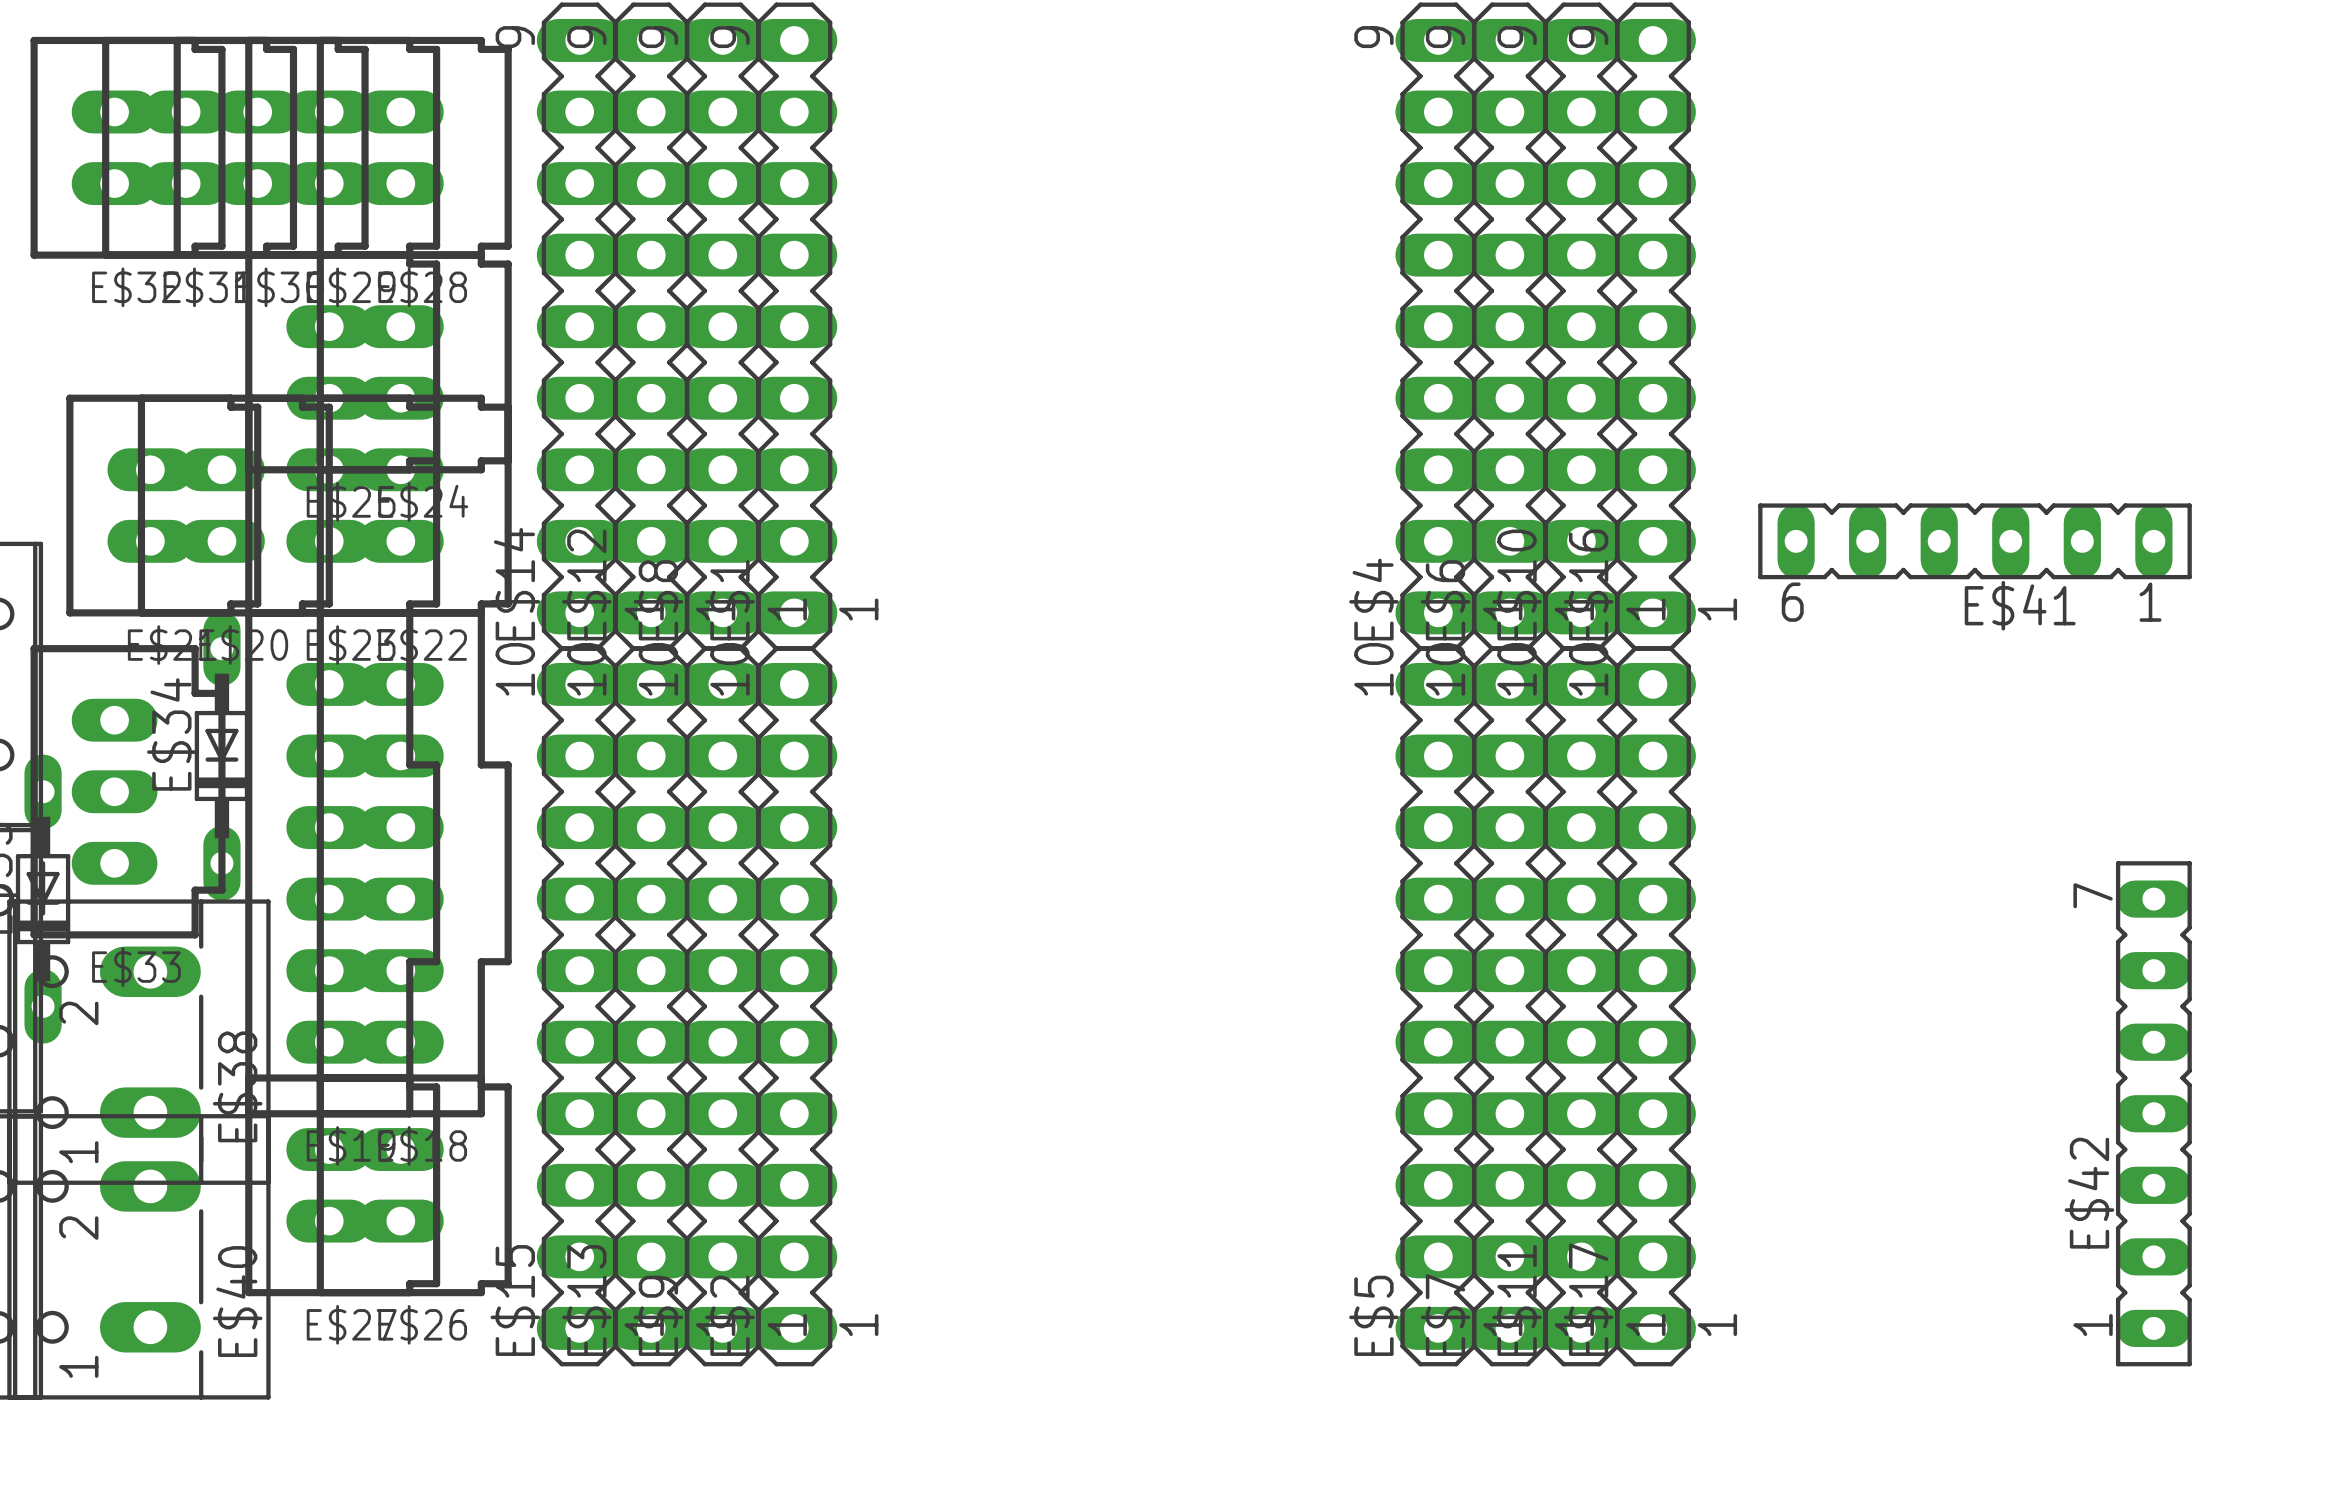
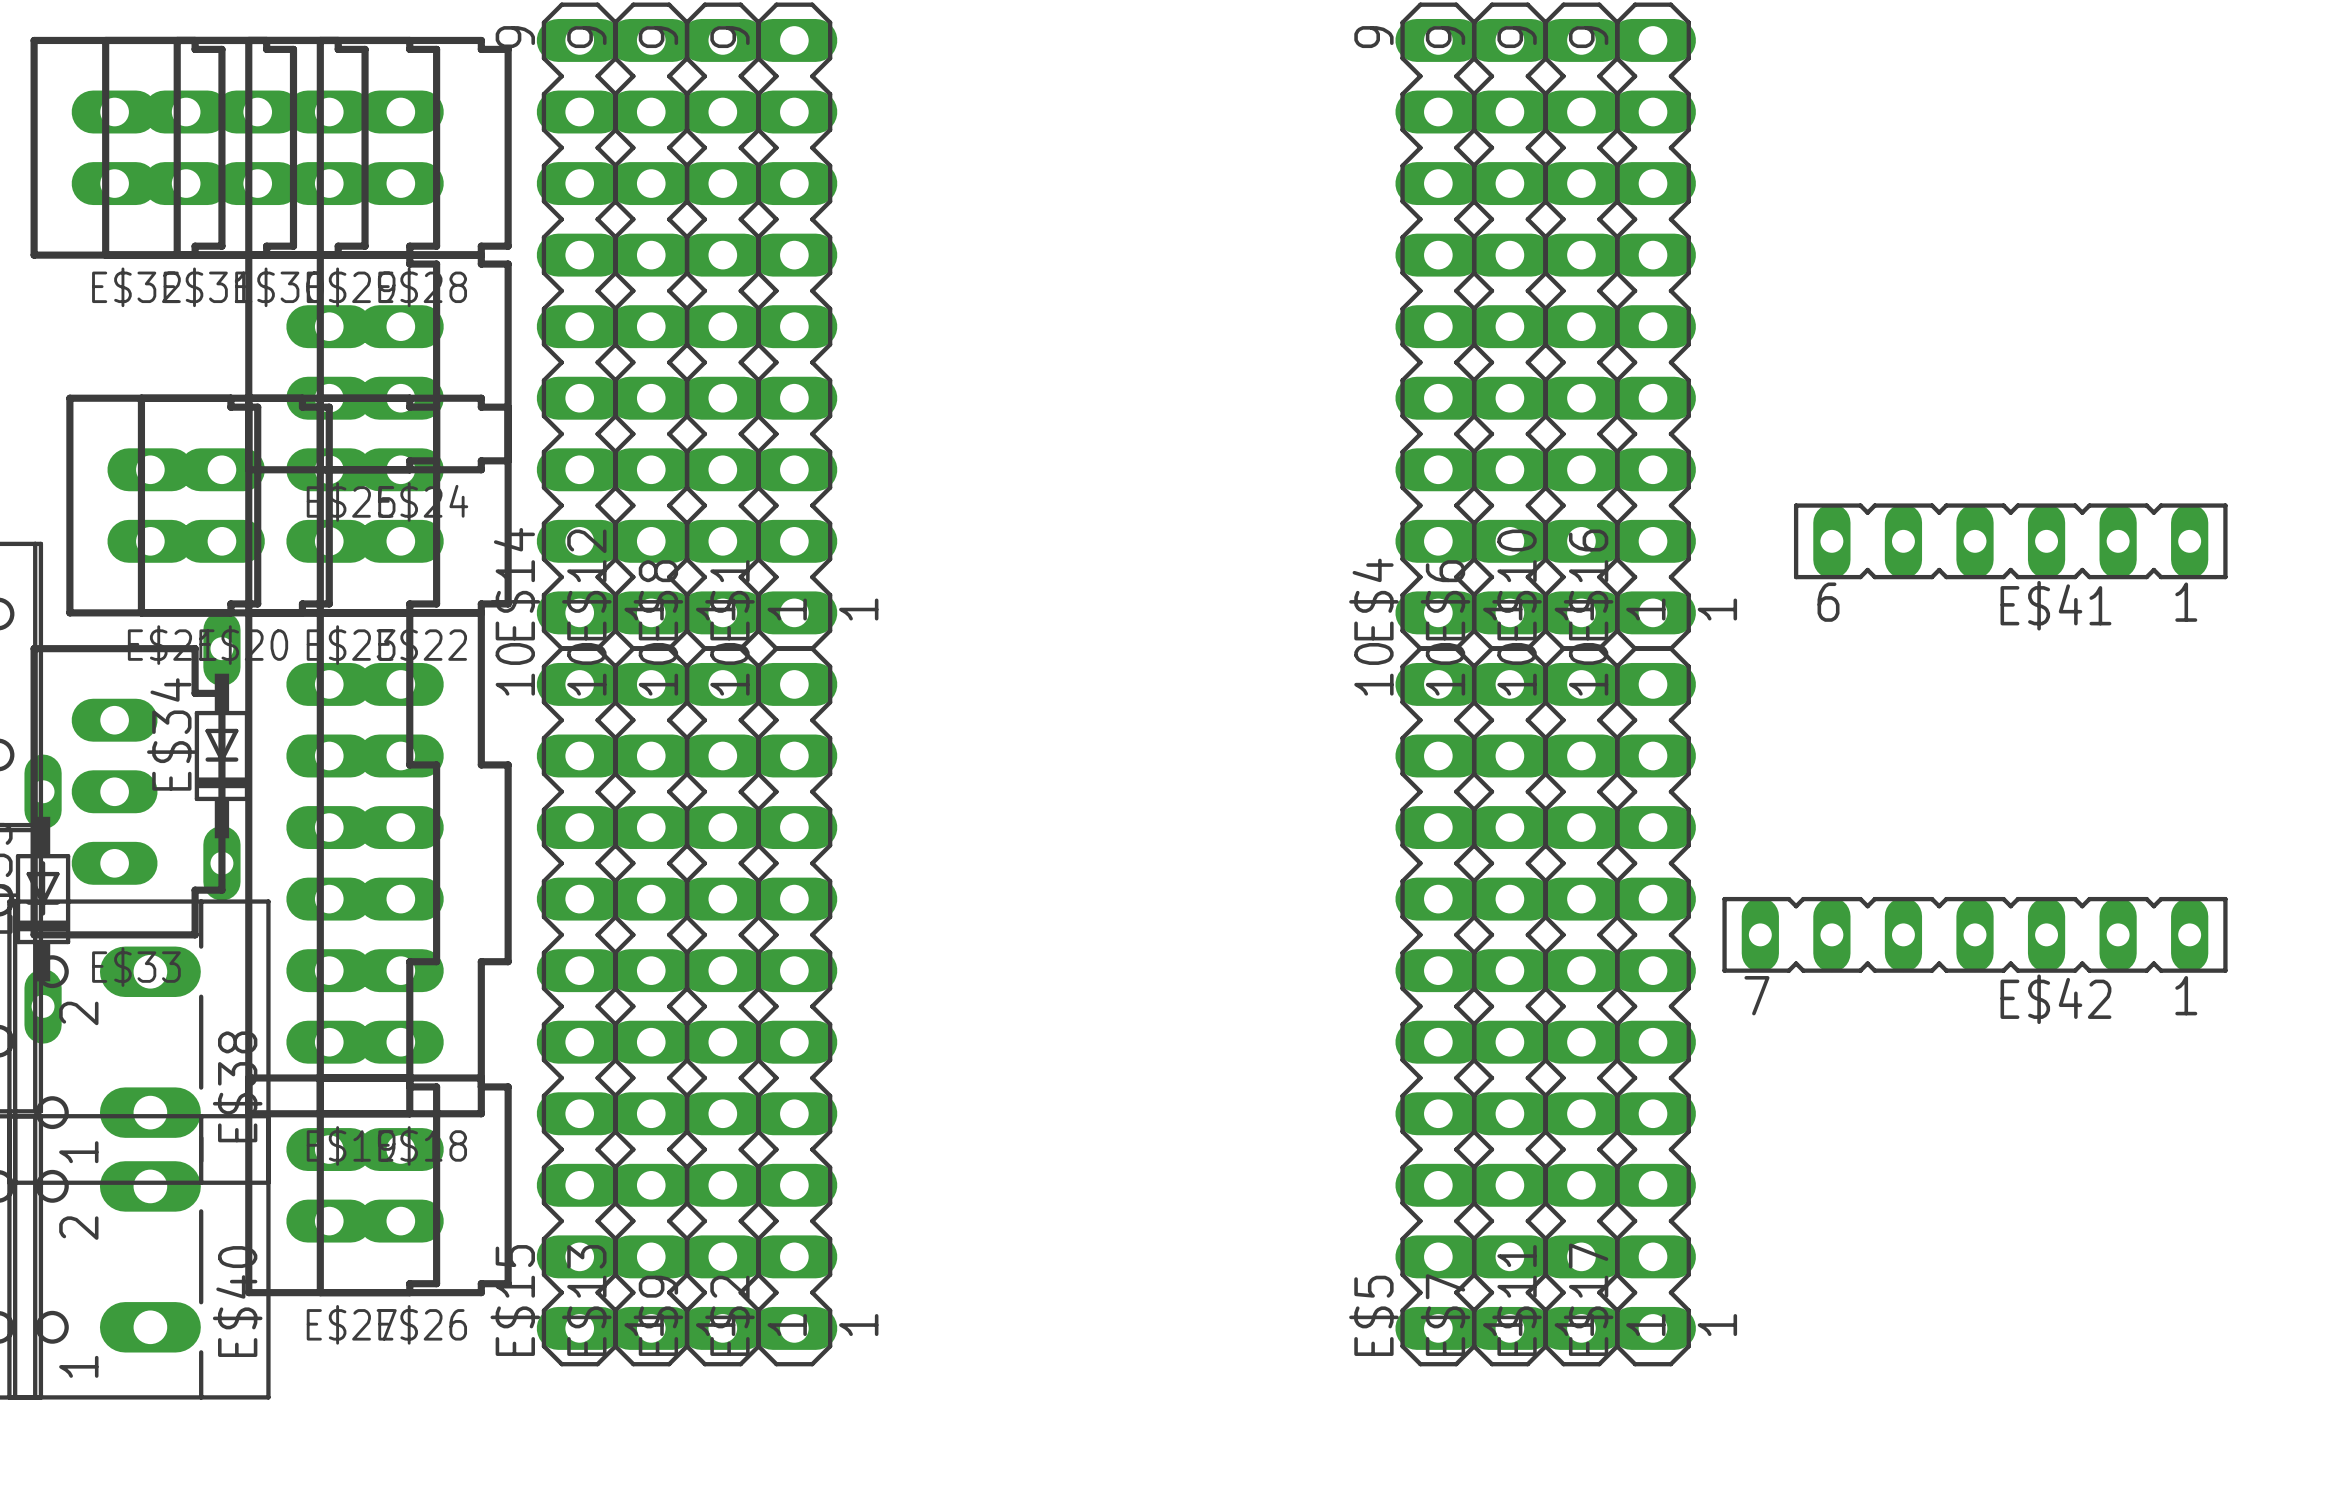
E$41 position: (1975, 541) -> (2010, 541)
E$42 footprint: [2115, 861, 2192, 1367] -> [1722, 896, 2228, 973]
E$42 name position: E$42 (2089, 1193) -> E$42 (2055, 999)

